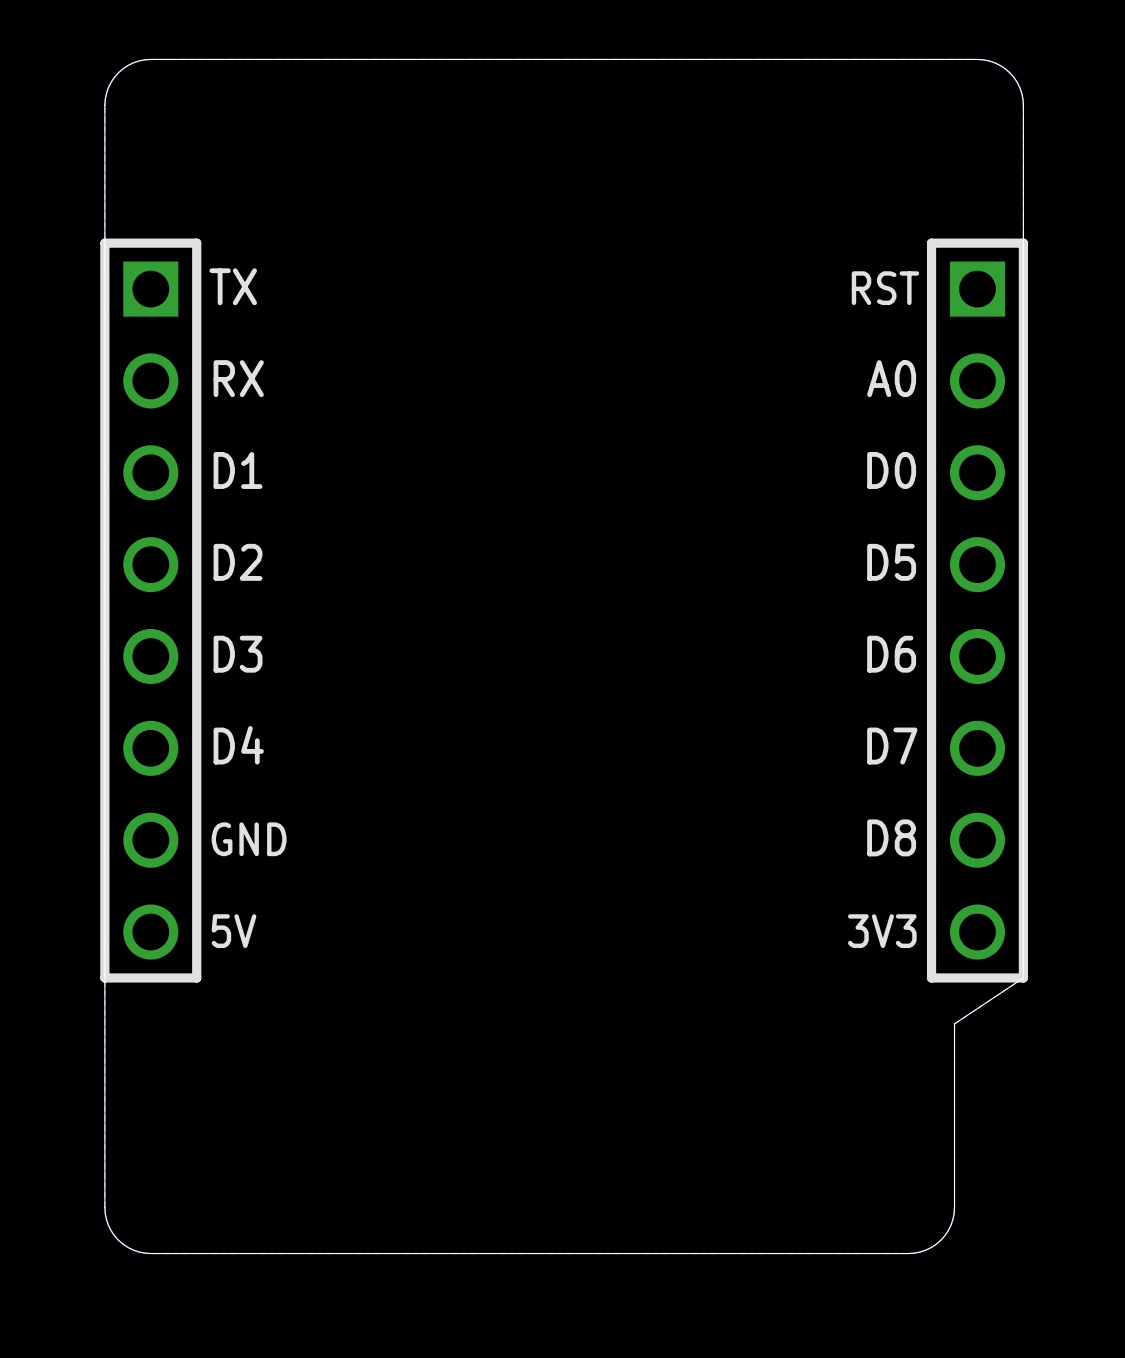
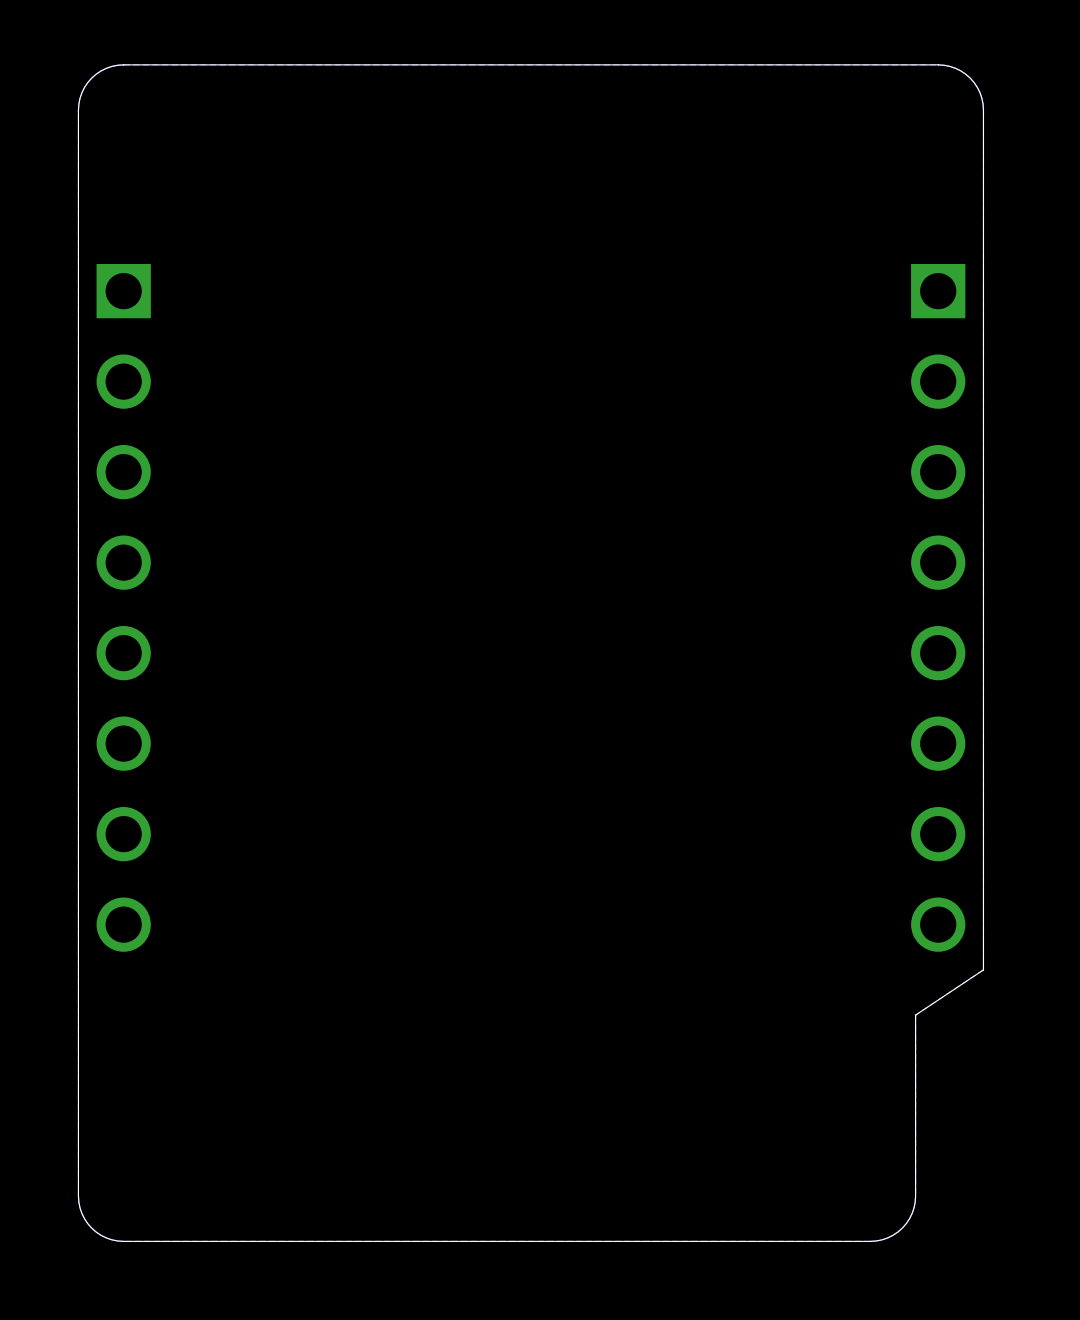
line: (196, 243) (104, 243) (104, 977) (196, 977) (196, 243) -> none
line: (1023, 243) (931, 243) (931, 977) (1023, 977) (1023, 243) -> none
text: TX (233, 286) -> none
text: RST (885, 288) -> none
text: RX (238, 378) -> none
text: A0 (891, 378) -> none
text: D1 (238, 470) -> none
text: D0 (891, 470) -> none
text: D2 (238, 562) -> none
text: D5 (891, 562) -> none
text: D3 (238, 654) -> none
text: D6 (891, 654) -> none
text: D4 (238, 745) -> none
text: D7 (892, 746) -> none
text: D8 (891, 837) -> none
text: GND (249, 839) -> none
text: 5V (234, 931) -> none
text: 3V3 (882, 931) -> none

